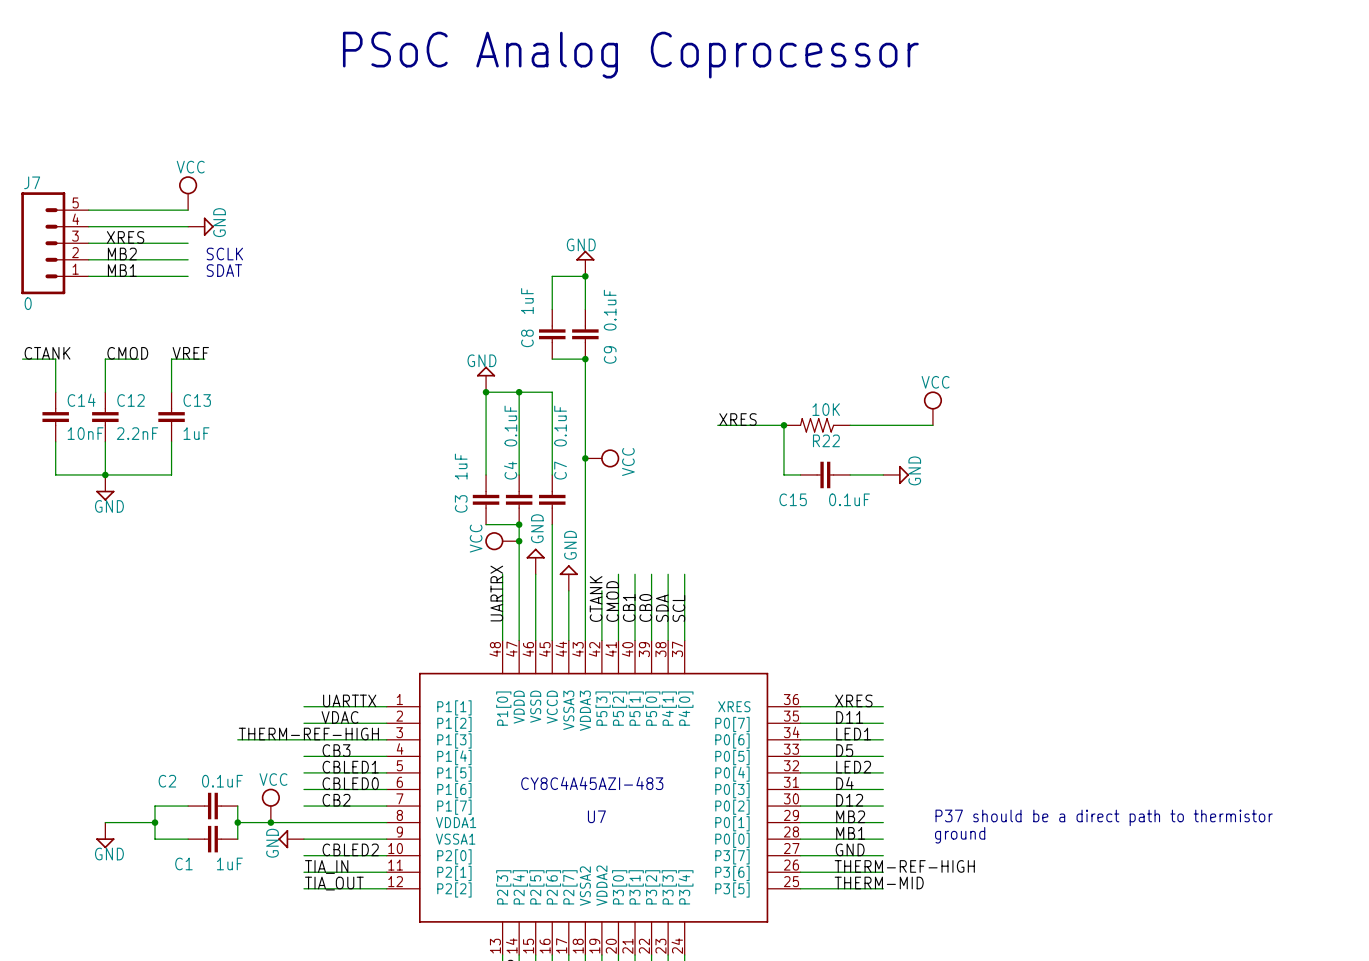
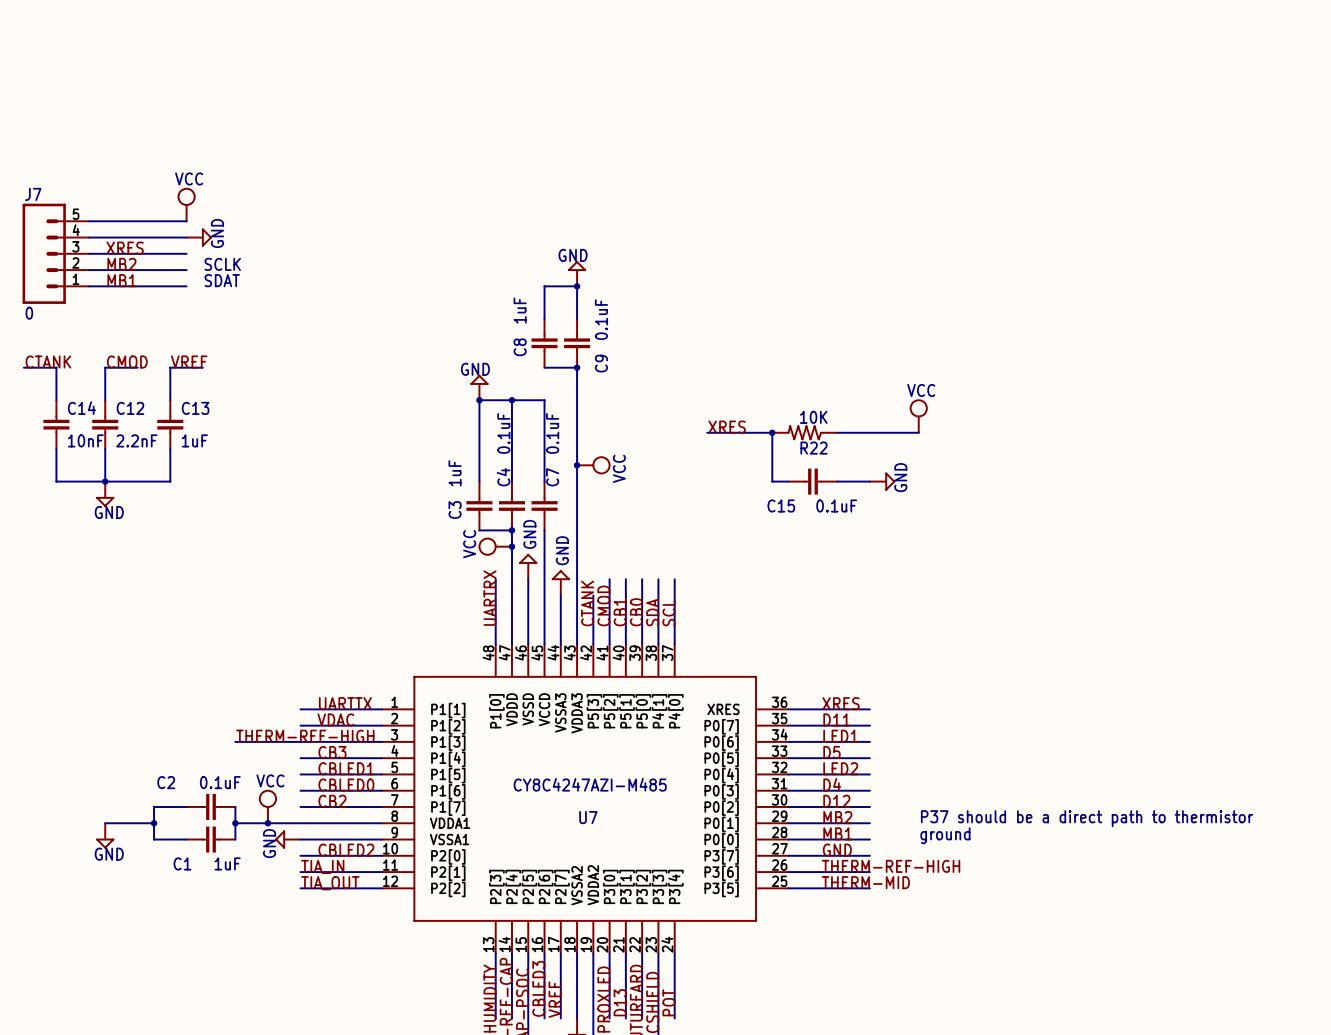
text: PSoC Analog Coprocessor (630, 55) -> none
text: CY8C4A45AZI-483 (592, 783) -> CY8C4247AZI-M485 (590, 784)

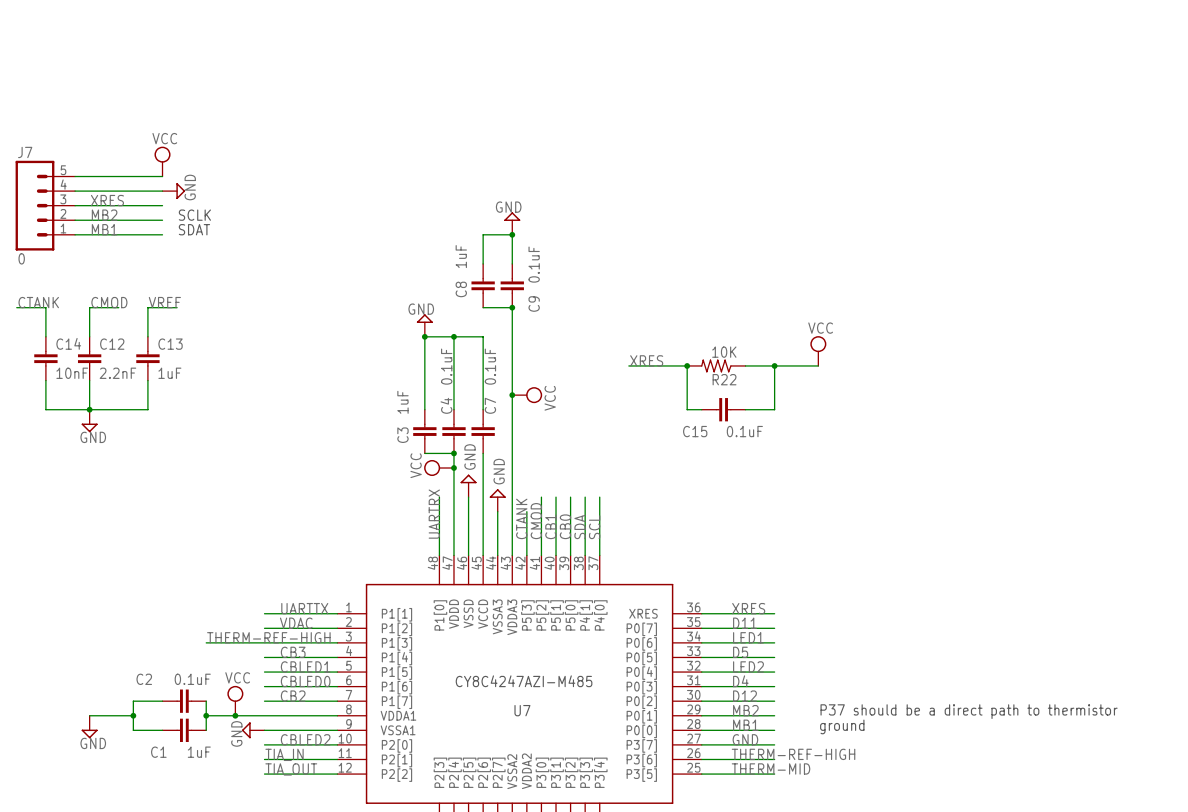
wire: none -> (774, 365) (774, 409)
junction: none -> (774, 365)
power symbol: GND (882, 481) -> none

